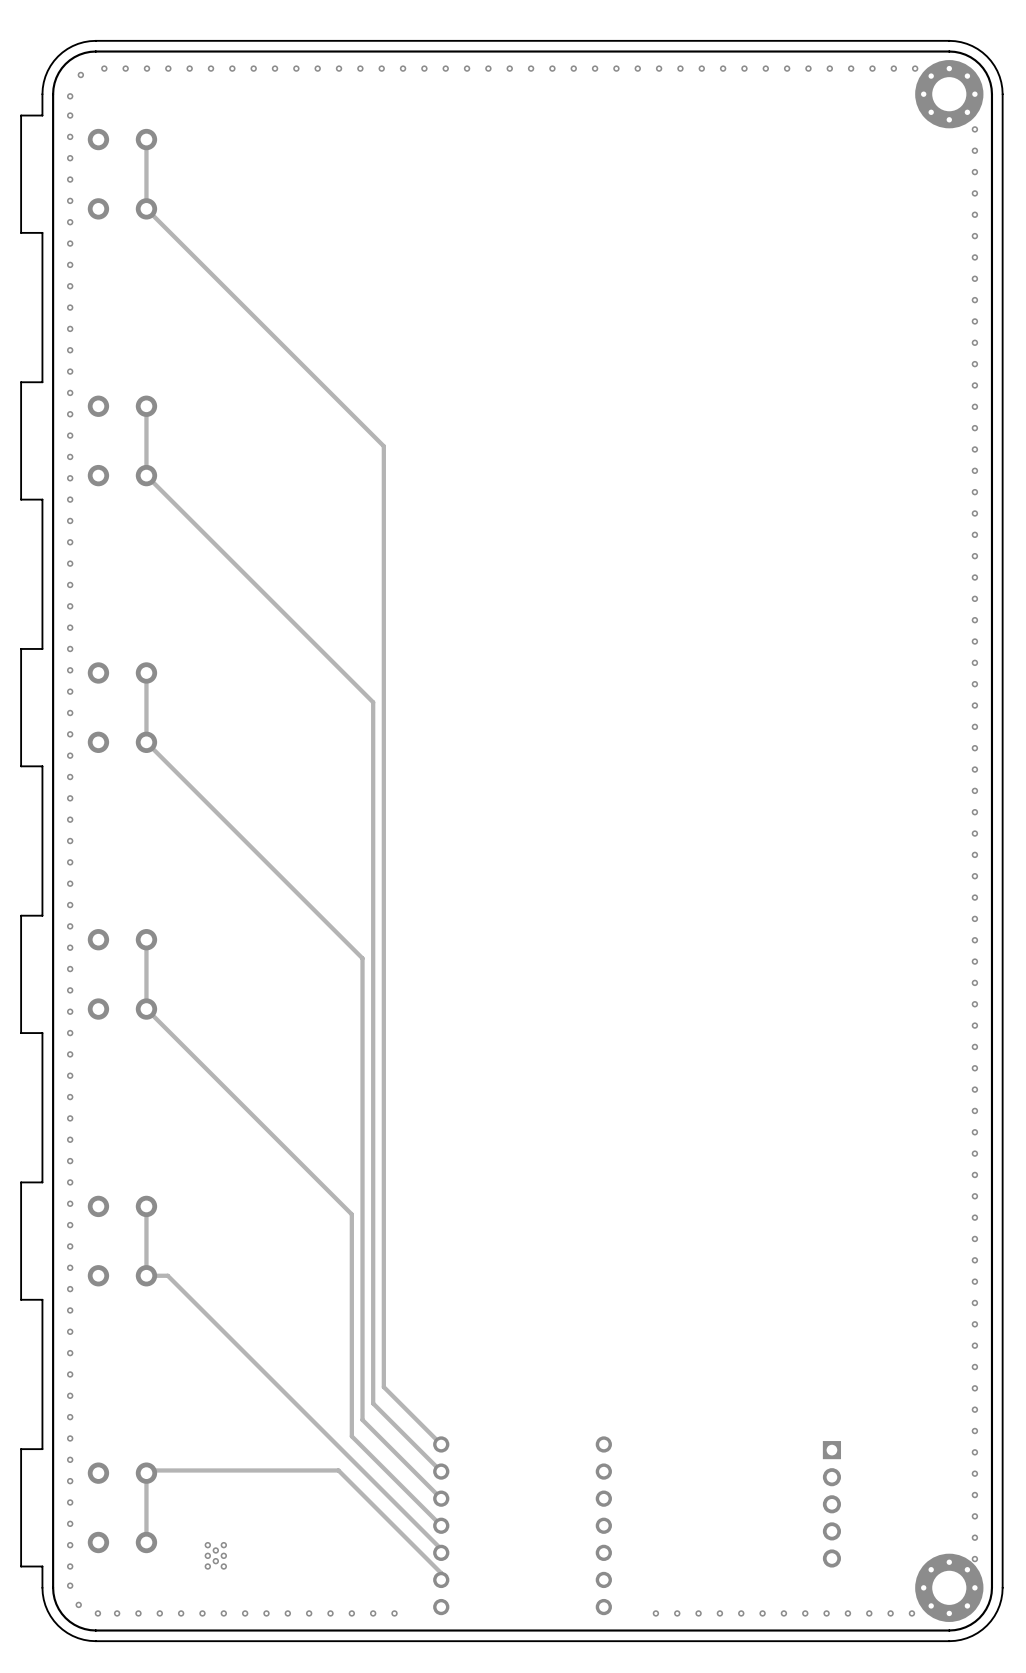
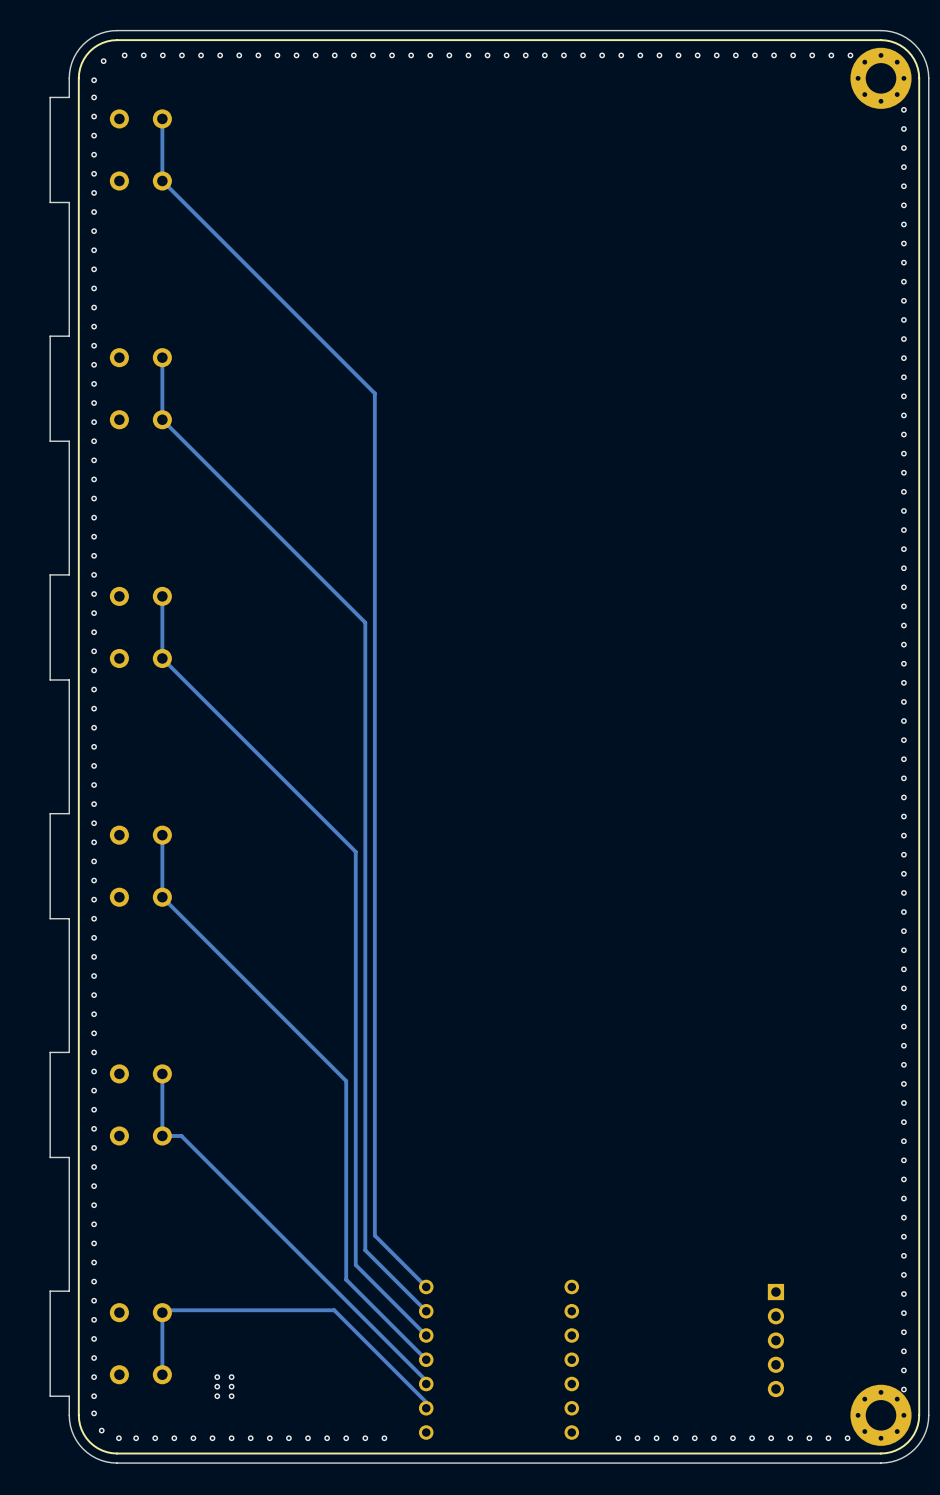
via: (215, 1550) -> none
via: (215, 1561) -> none

